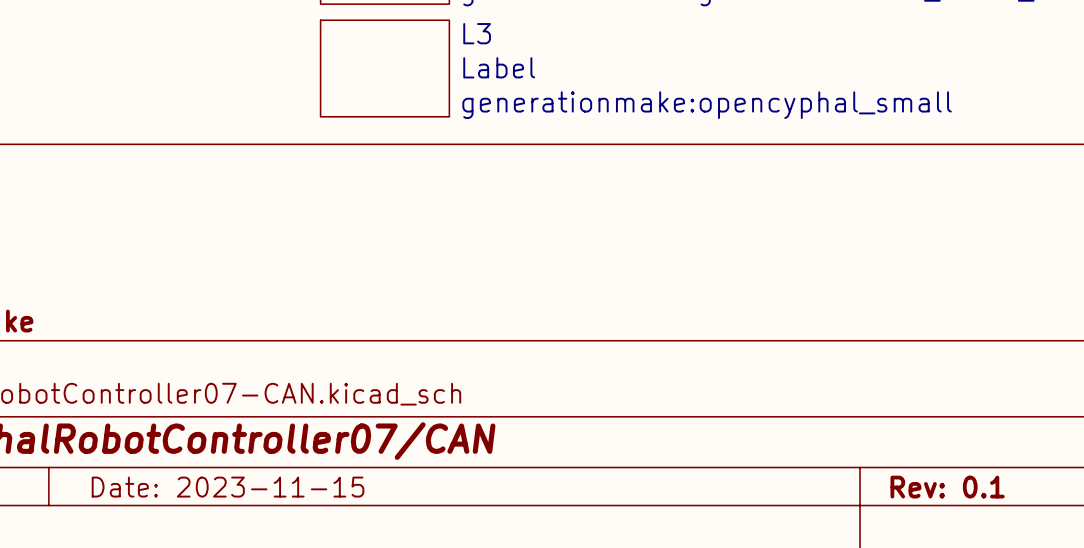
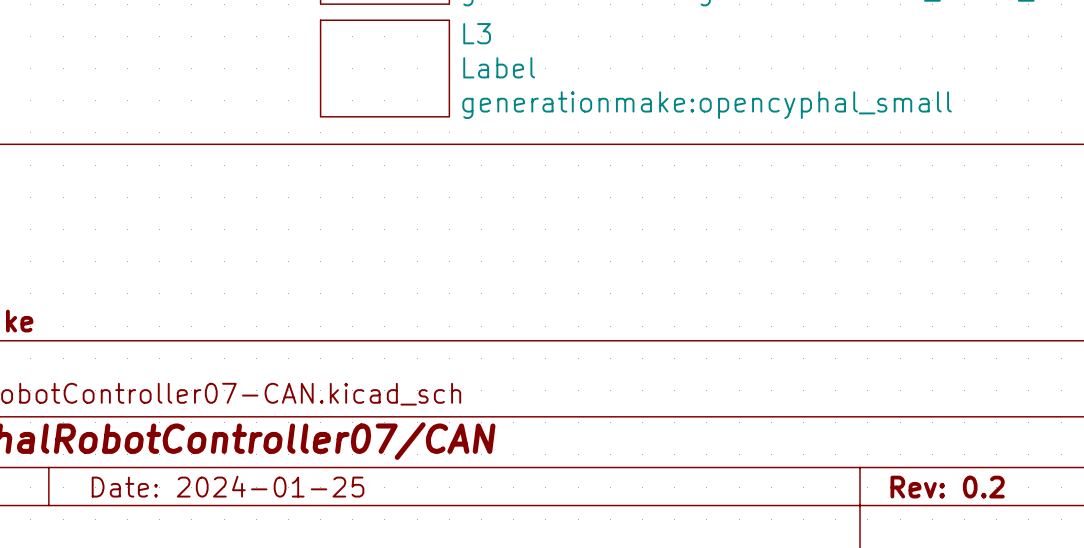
title block: Date: 2023-11-15 (228, 487) -> Date: 2024-01-25 (228, 486)
title block: Rev: 0.1 (947, 487) -> Rev: 0.2 (947, 487)

